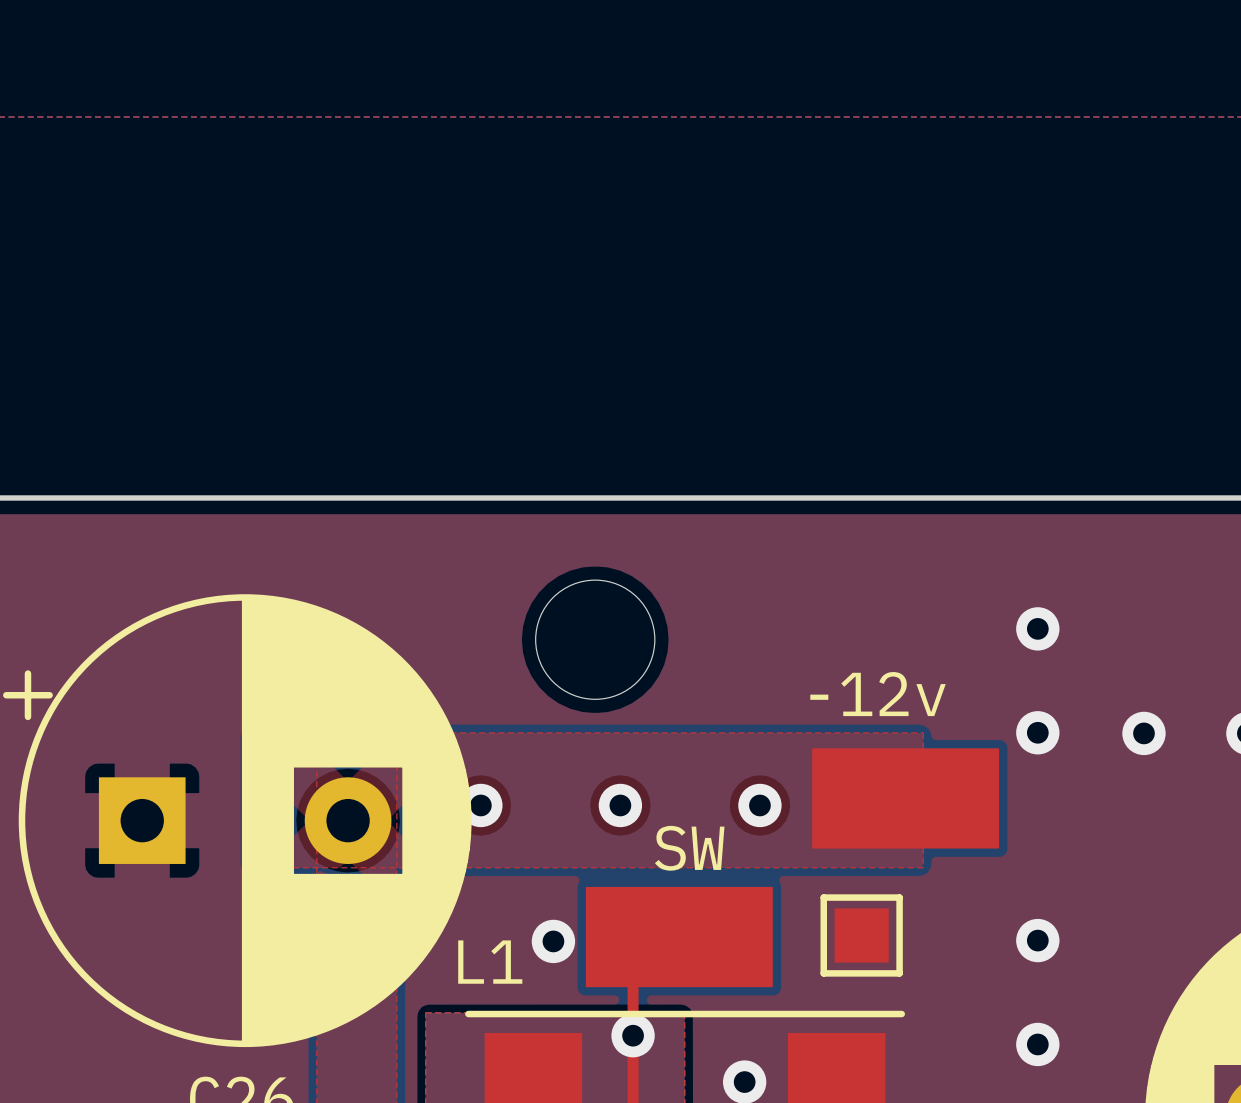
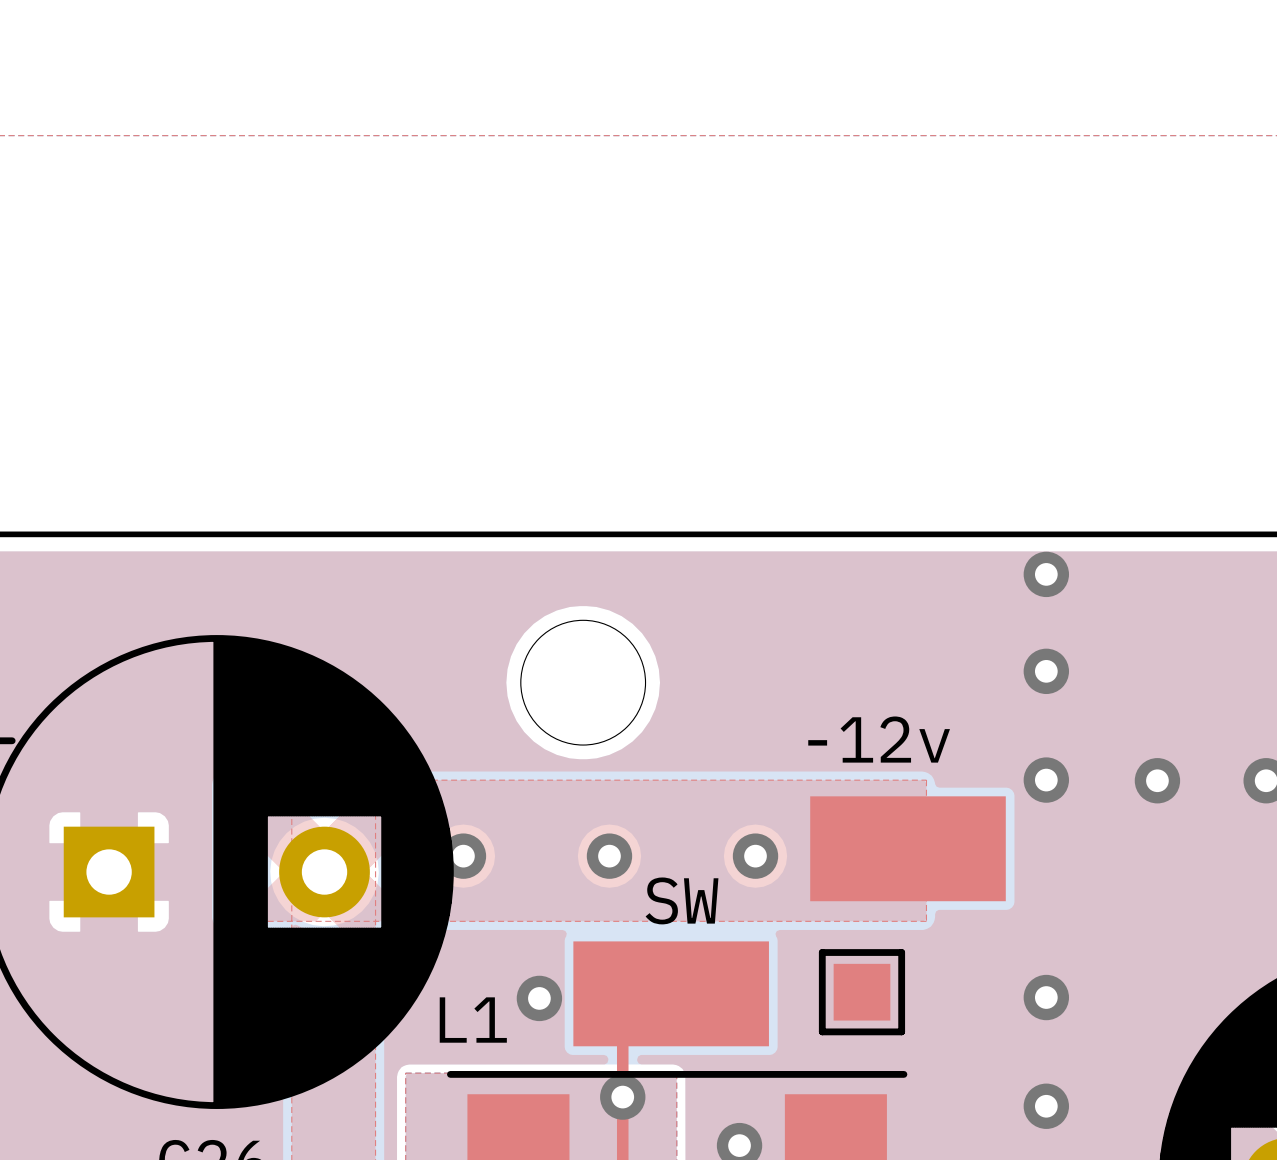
via: none -> (1046, 574)

